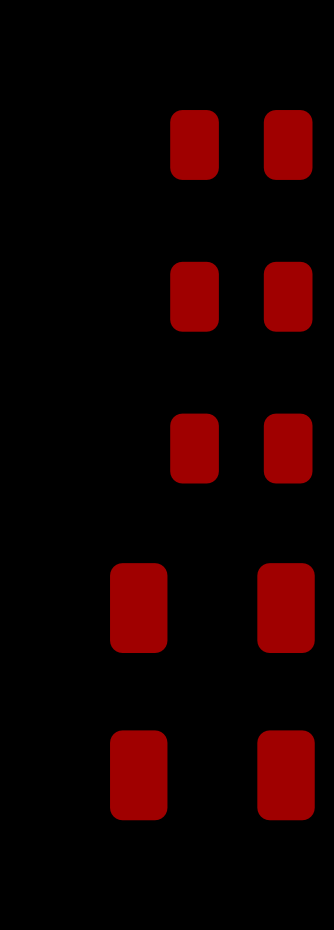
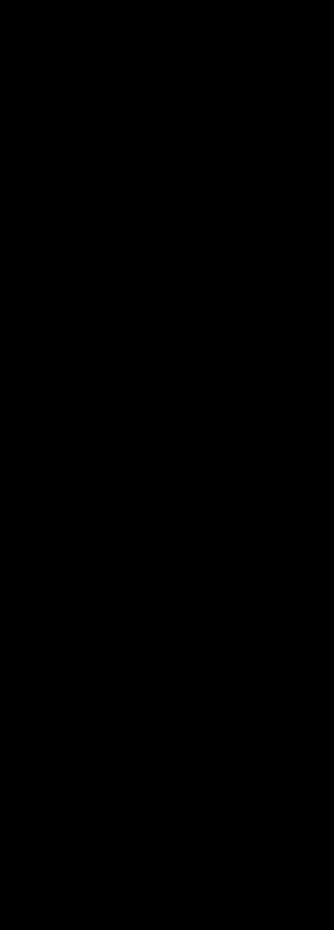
part: (241, 144) -> none
part: (241, 296) -> none
part: (241, 448) -> none
part: (212, 608) -> none
part: (212, 775) -> none

